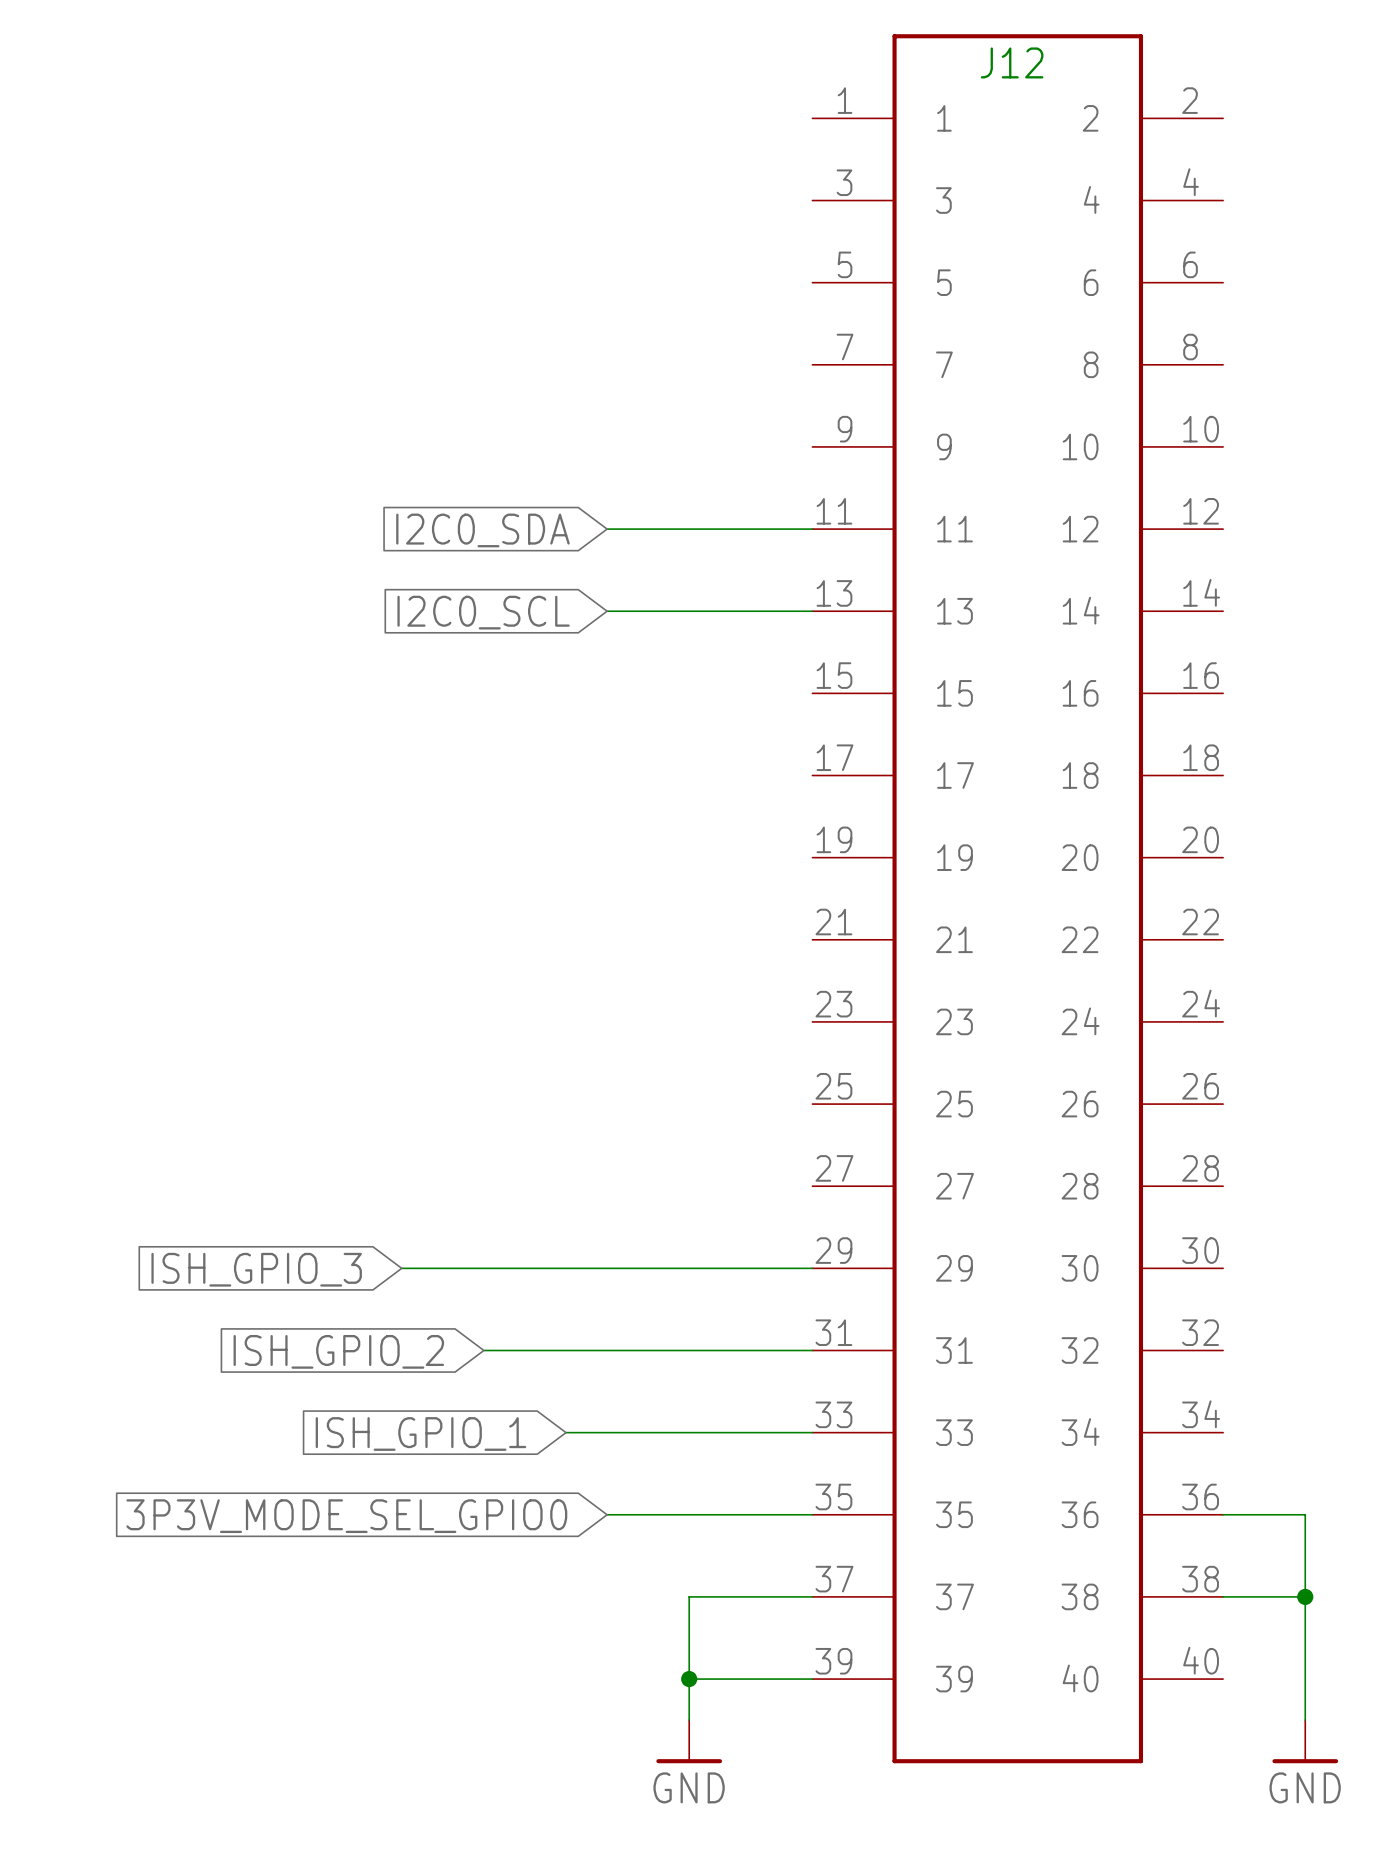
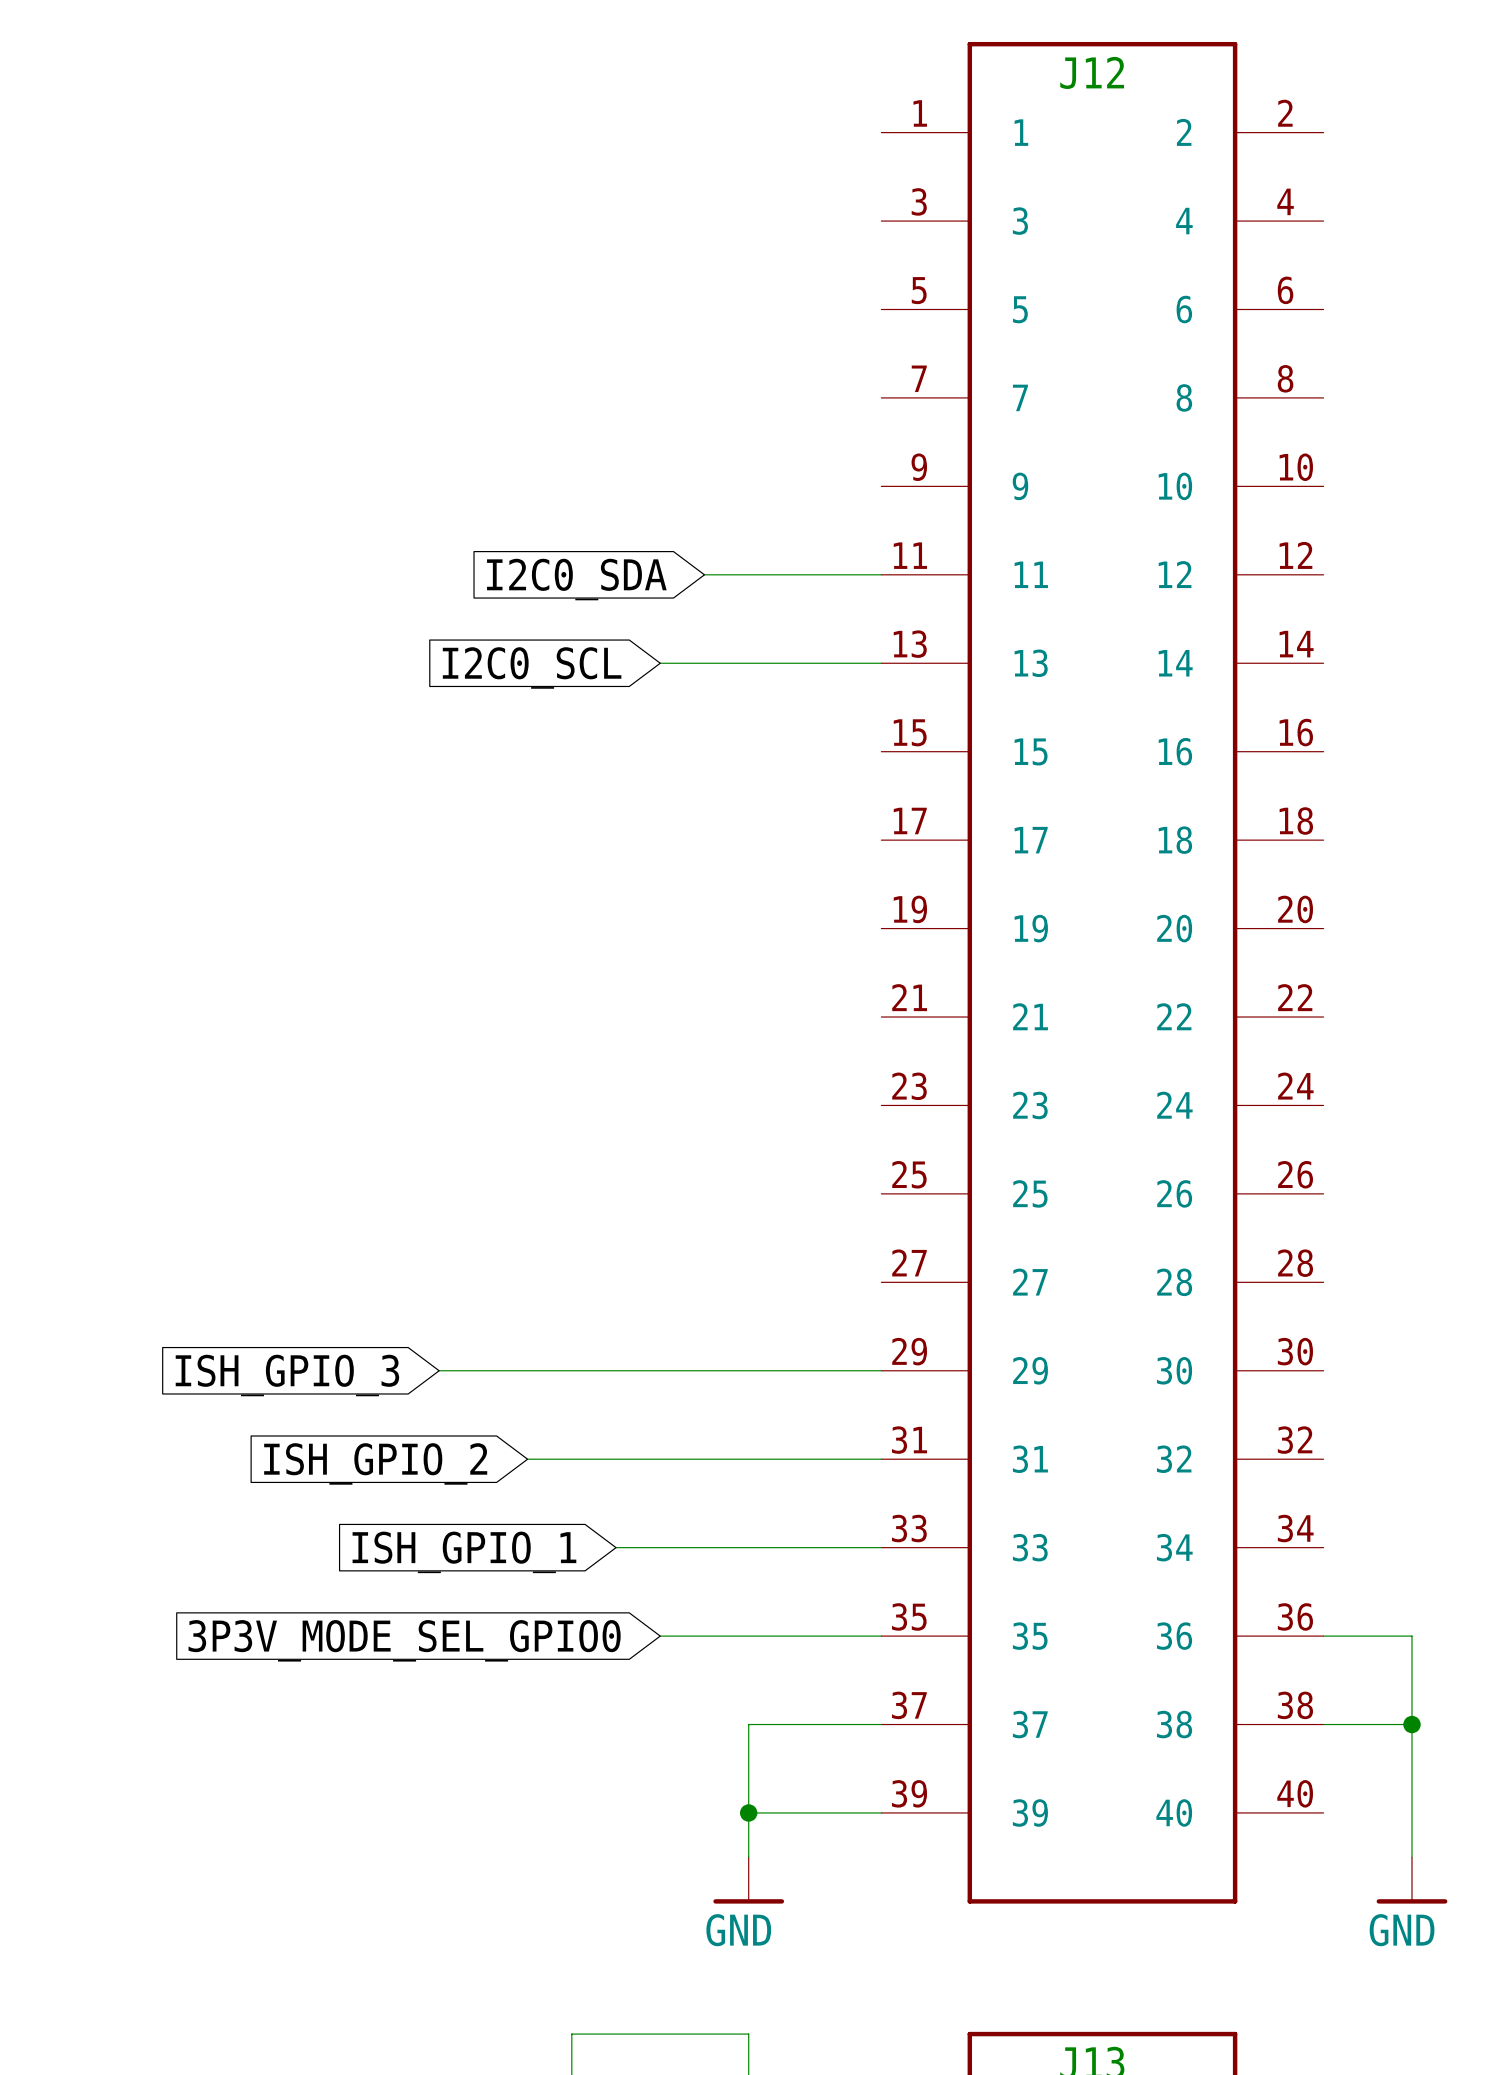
wire: (607, 529) (648, 529) -> none
global label position: I2C0_SDA (482, 530) -> I2C0_SDA (576, 579)

